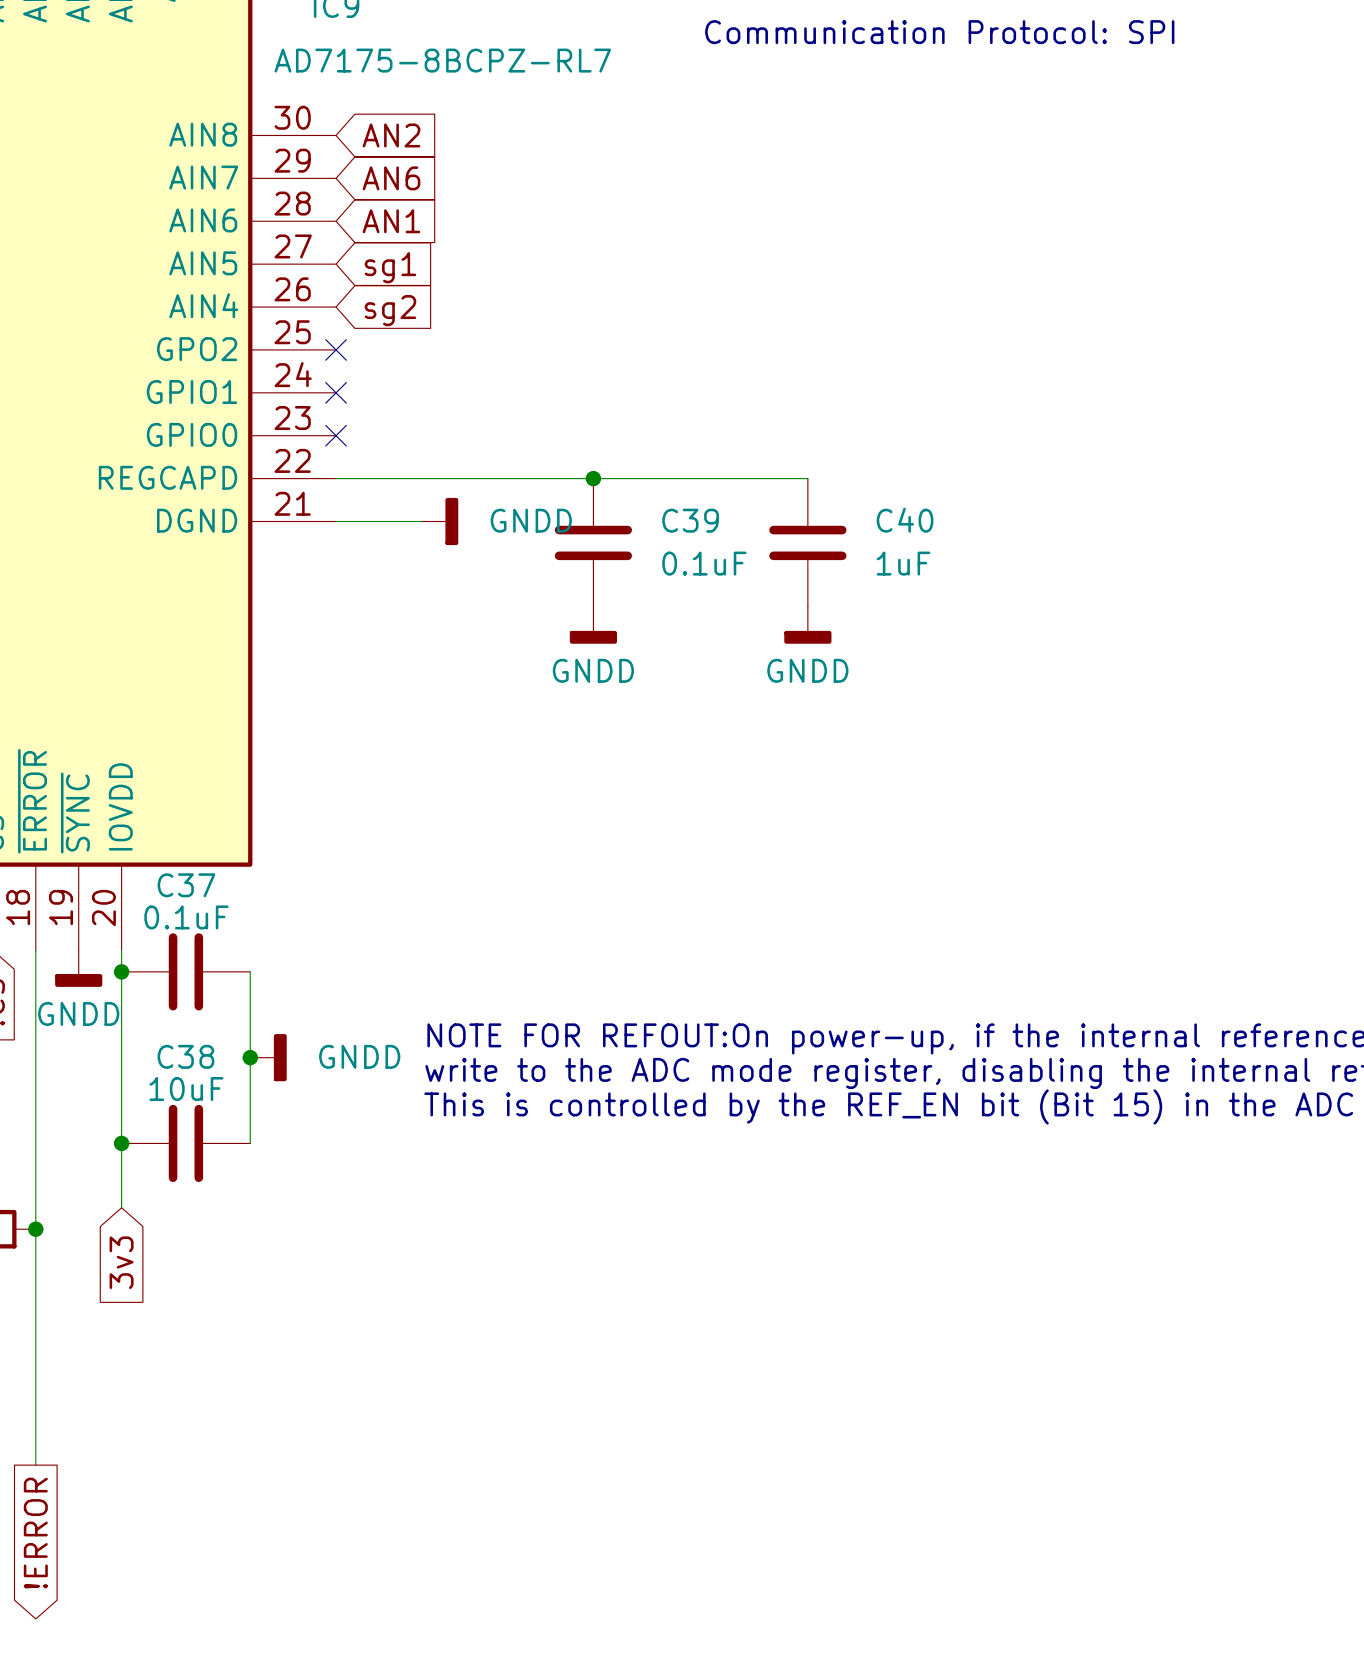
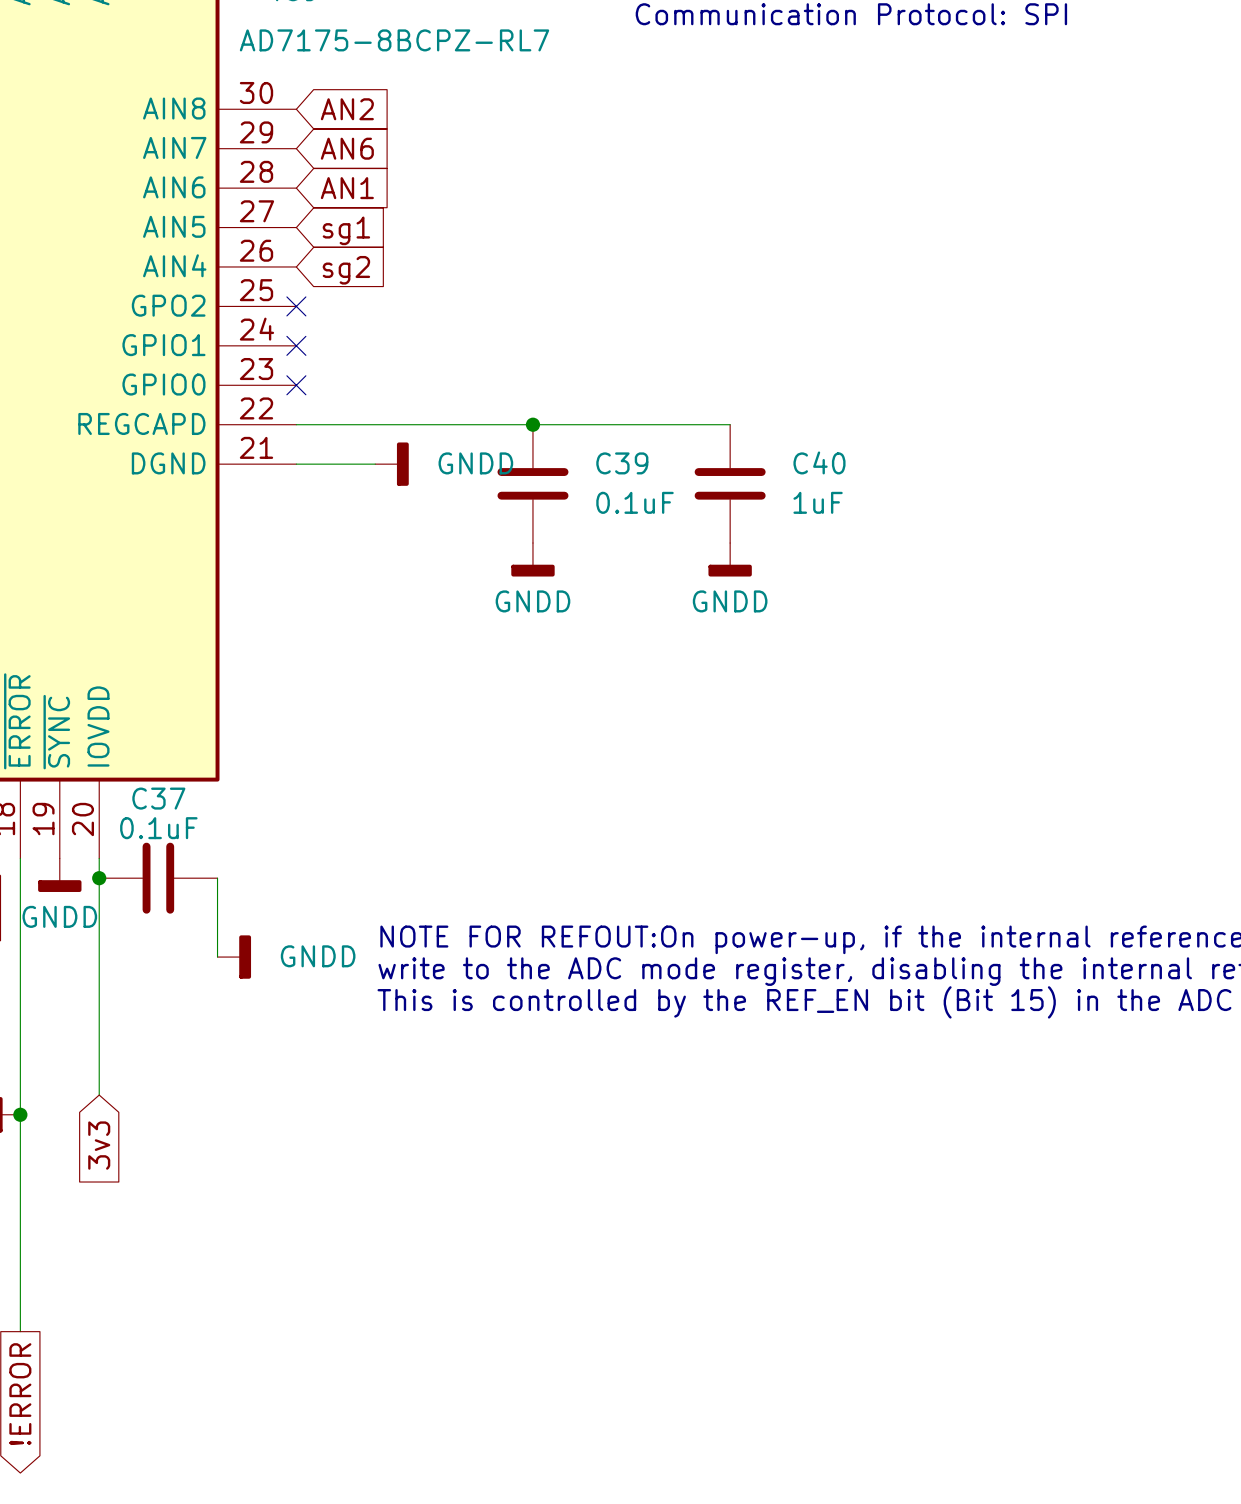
wire: (250, 1057) (250, 1143) -> none
junction: (250, 1057) -> none
junction: (121, 1143) -> none
C38: 10uF (185, 1143) -> none

